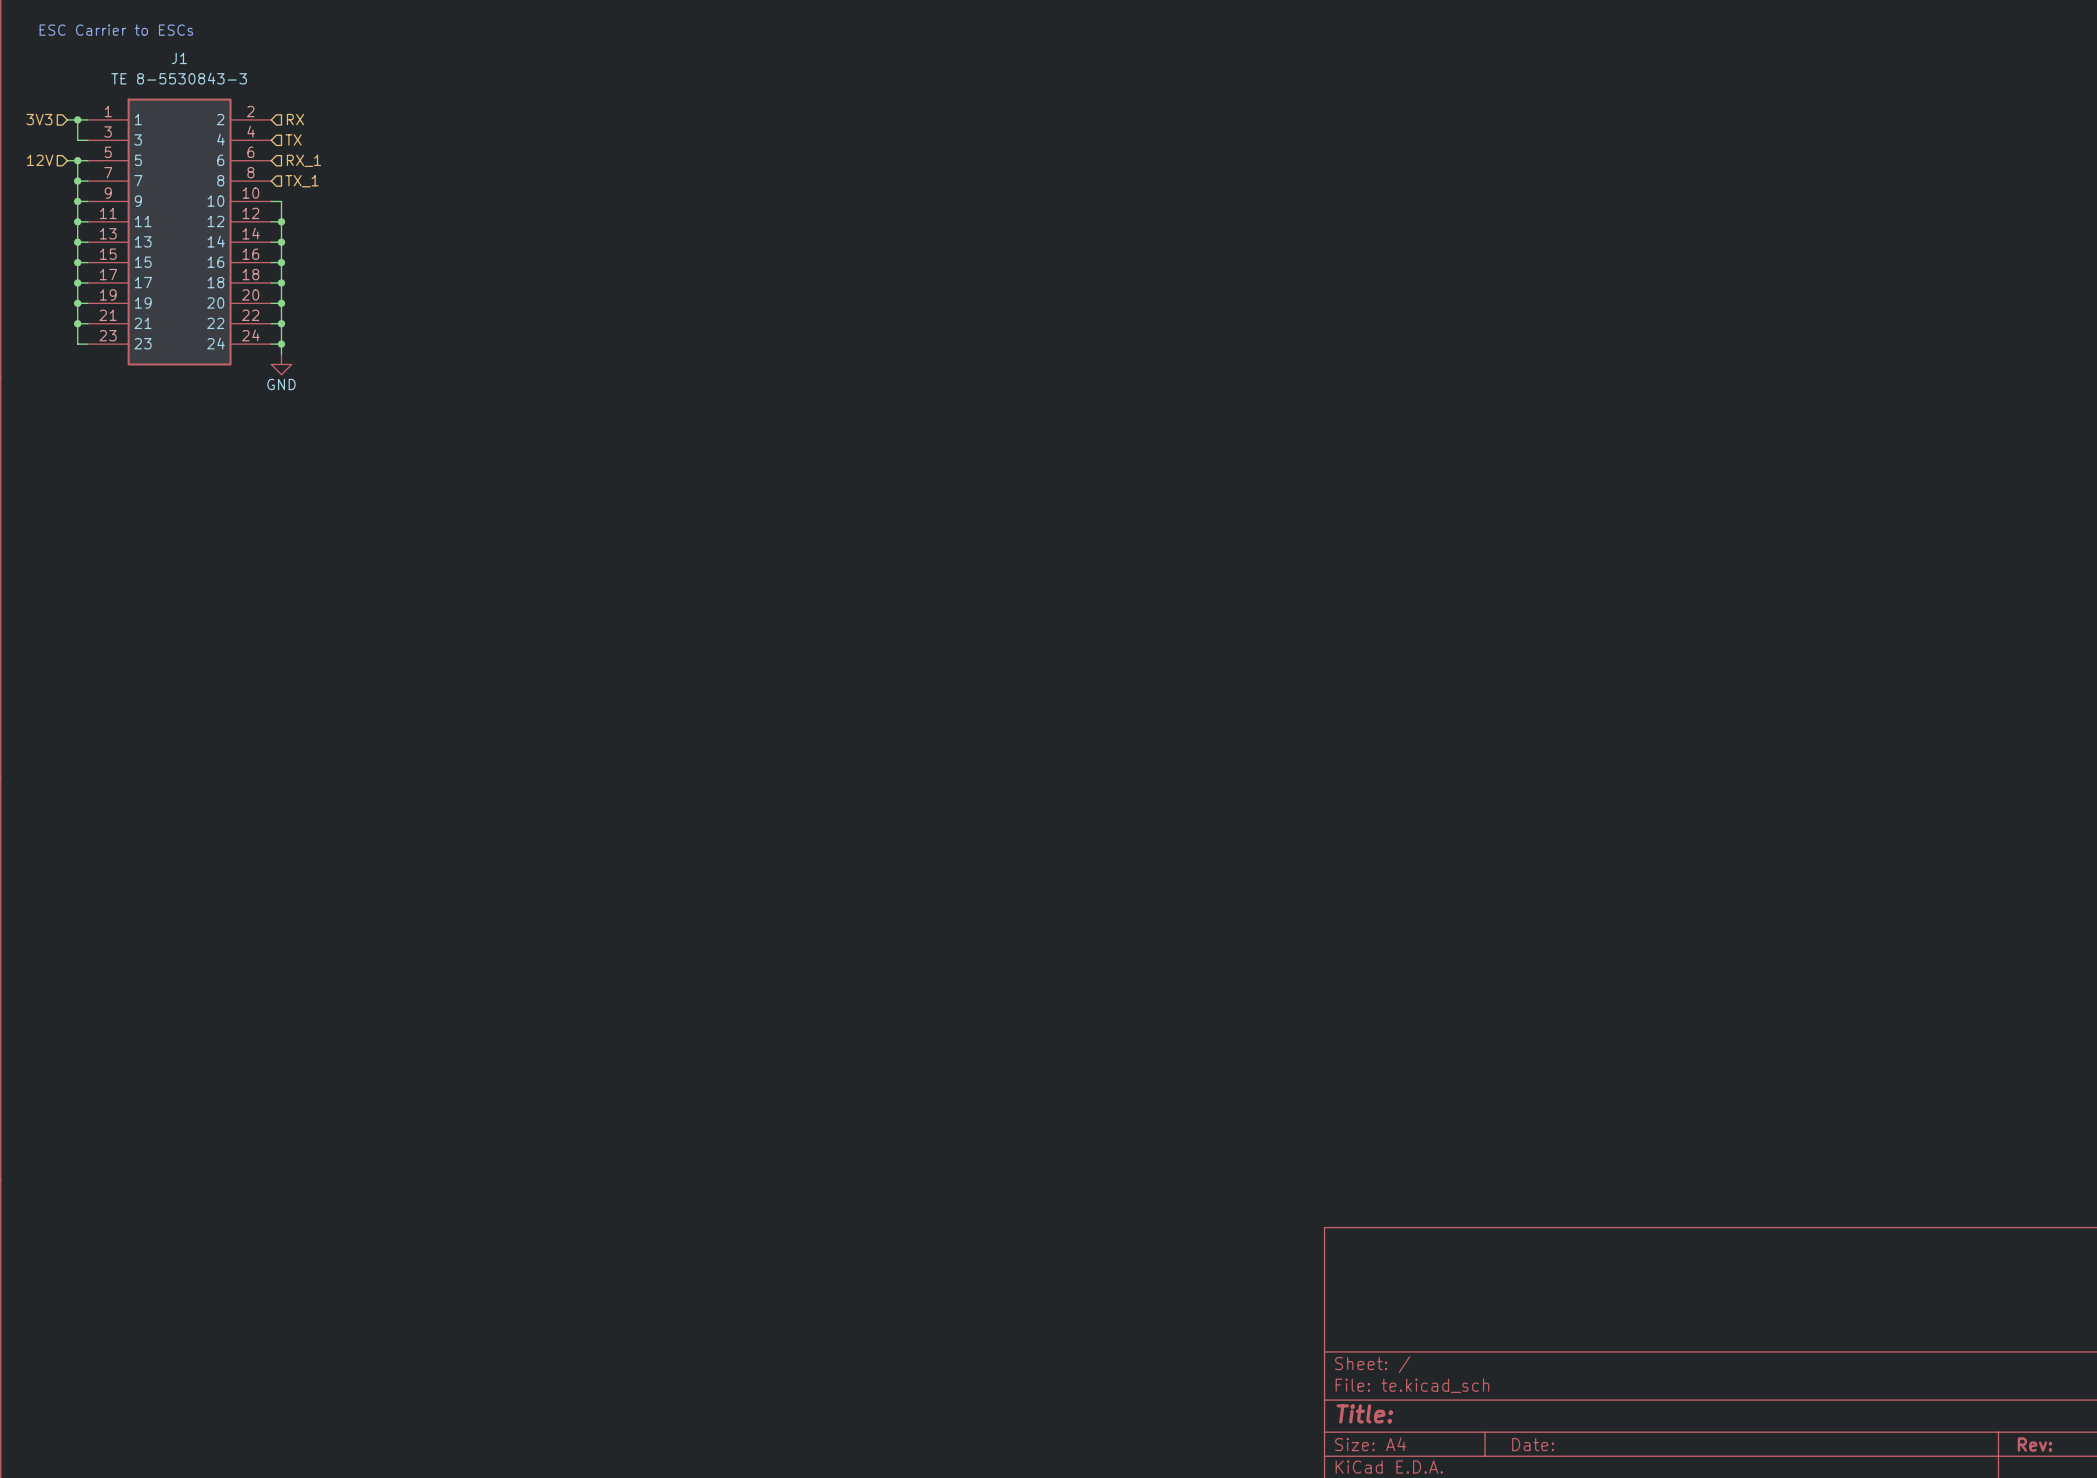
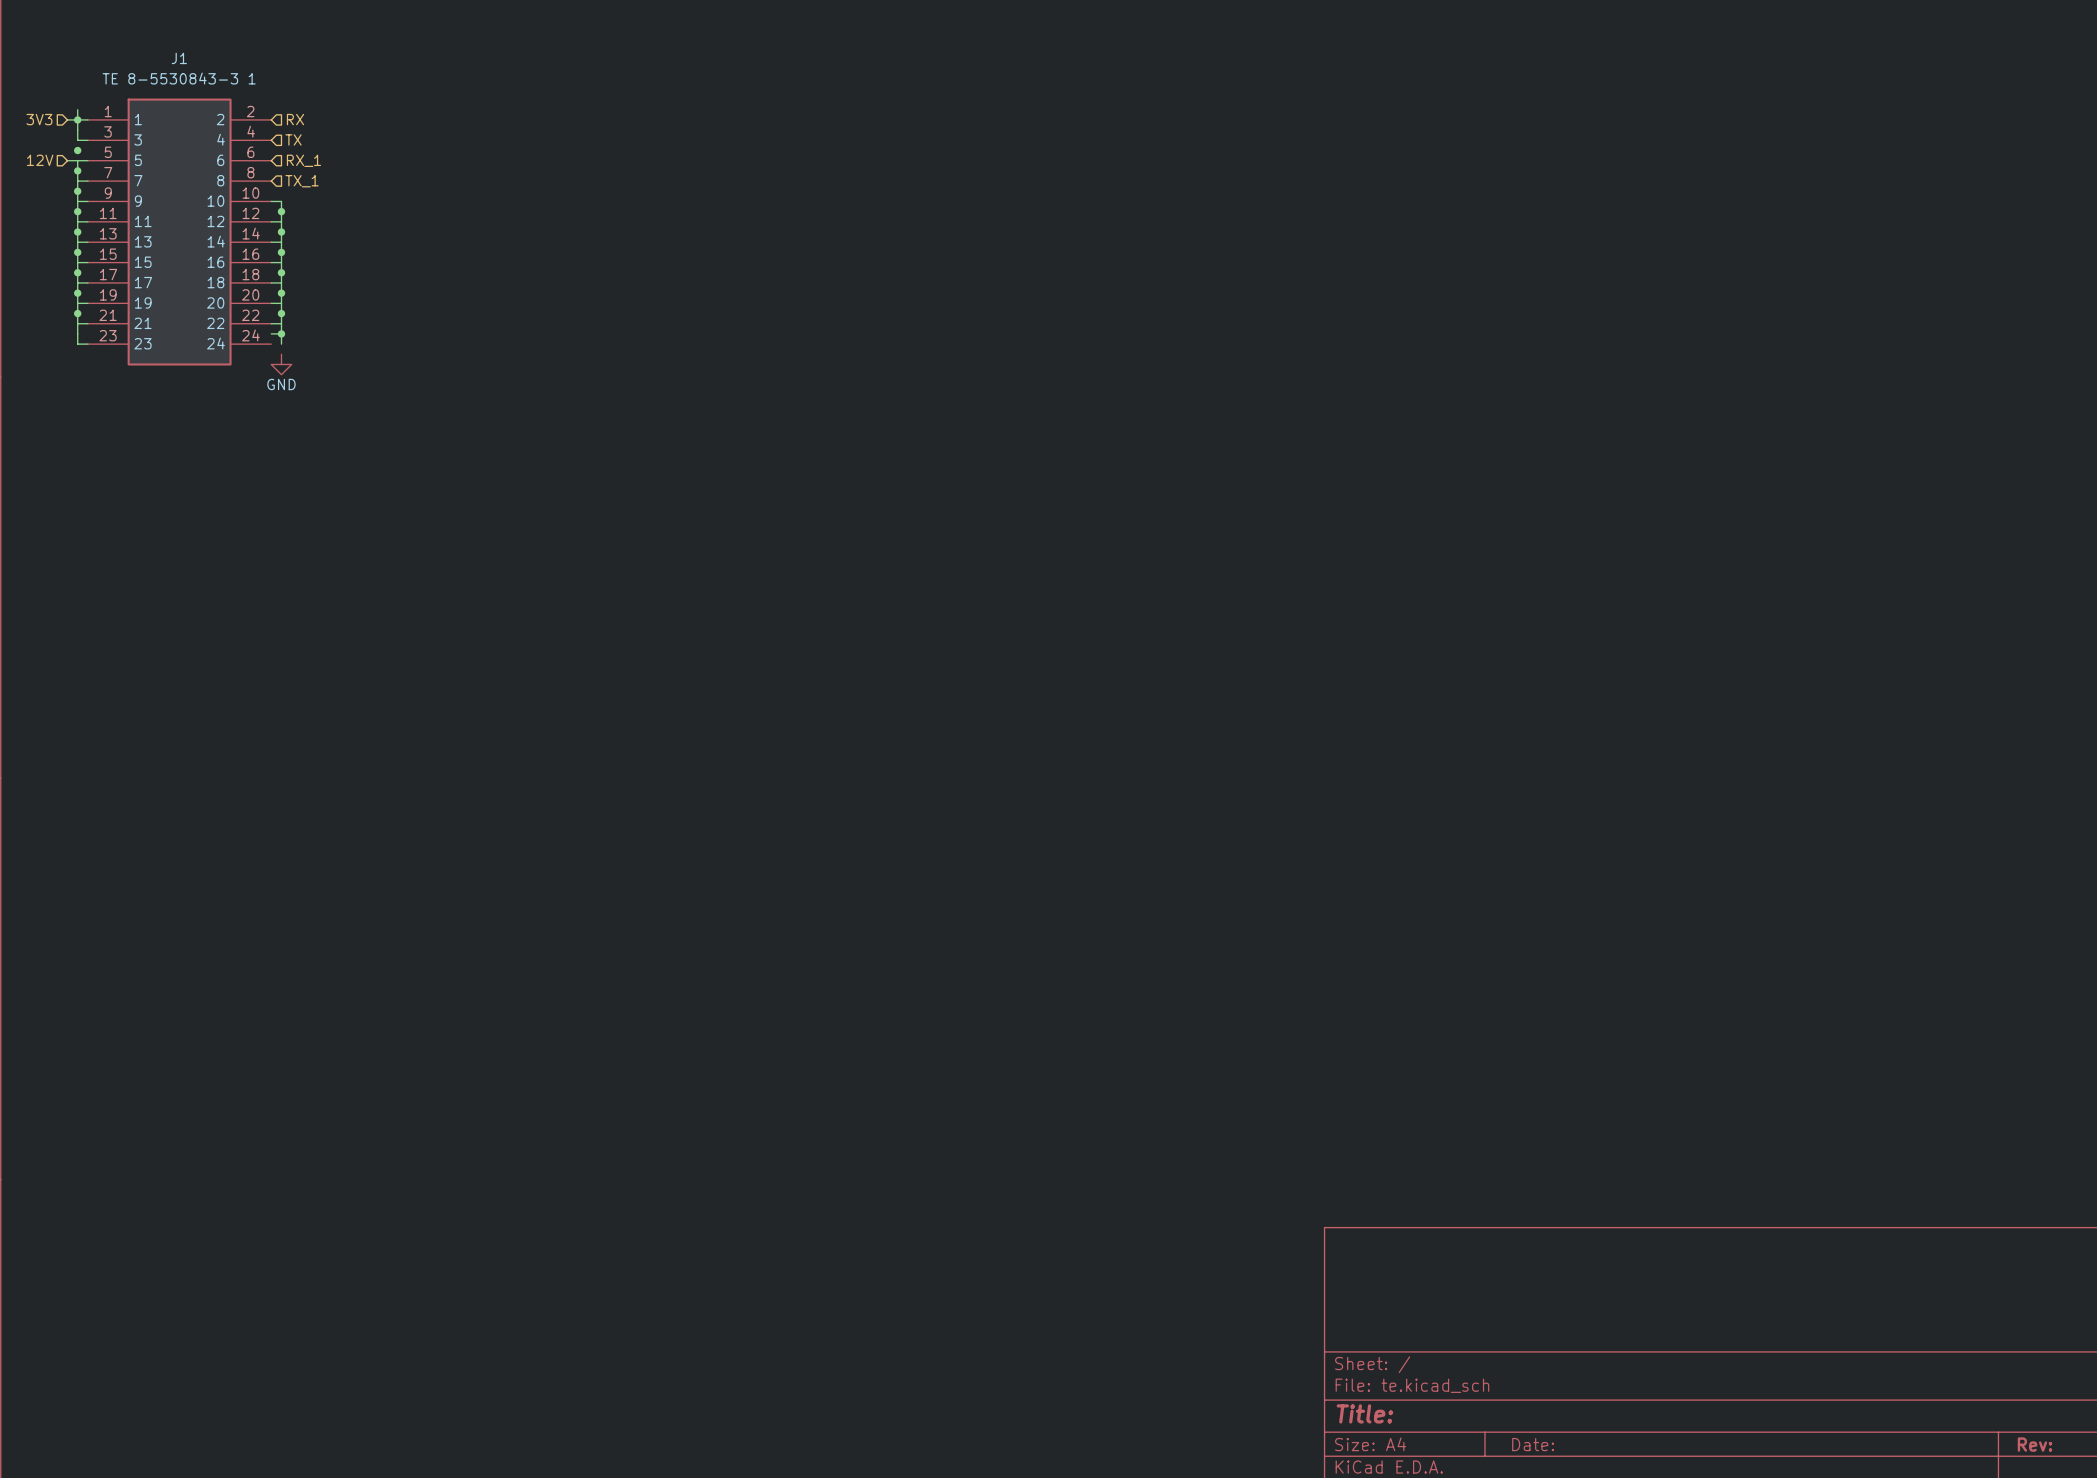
text: ESC Carrier to ESCs (116, 30) -> none
J1 value: TE 8-5530843-3 (179, 78) -> TE 8-5530843-3 1 (179, 78)
wire: none -> (77, 109) (77, 119)
junction: none -> (77, 150)
junction: (77, 160) -> none
junction: none -> (77, 170)
junction: (77, 181) -> none
junction: none -> (77, 191)
junction: (77, 201) -> none
junction: none -> (77, 211)
junction: none -> (281, 211)
junction: (77, 221) -> none
junction: (281, 221) -> none
junction: none -> (77, 232)
junction: none -> (281, 232)
junction: (77, 242) -> none
junction: (281, 242) -> none
junction: none -> (77, 252)
junction: none -> (281, 252)
junction: (77, 262) -> none
junction: (281, 262) -> none
junction: none -> (77, 272)
junction: none -> (281, 272)
junction: (77, 282) -> none
junction: (281, 282) -> none
junction: none -> (77, 293)
junction: none -> (281, 293)
junction: (77, 303) -> none
junction: (281, 303) -> none
junction: none -> (77, 313)
junction: none -> (281, 313)
junction: (77, 323) -> none
junction: (281, 323) -> none
wire: none -> (271, 333) (281, 333)
junction: none -> (281, 333)
wire: (271, 344) (281, 344) (281, 354) -> none
junction: (281, 344) -> none

